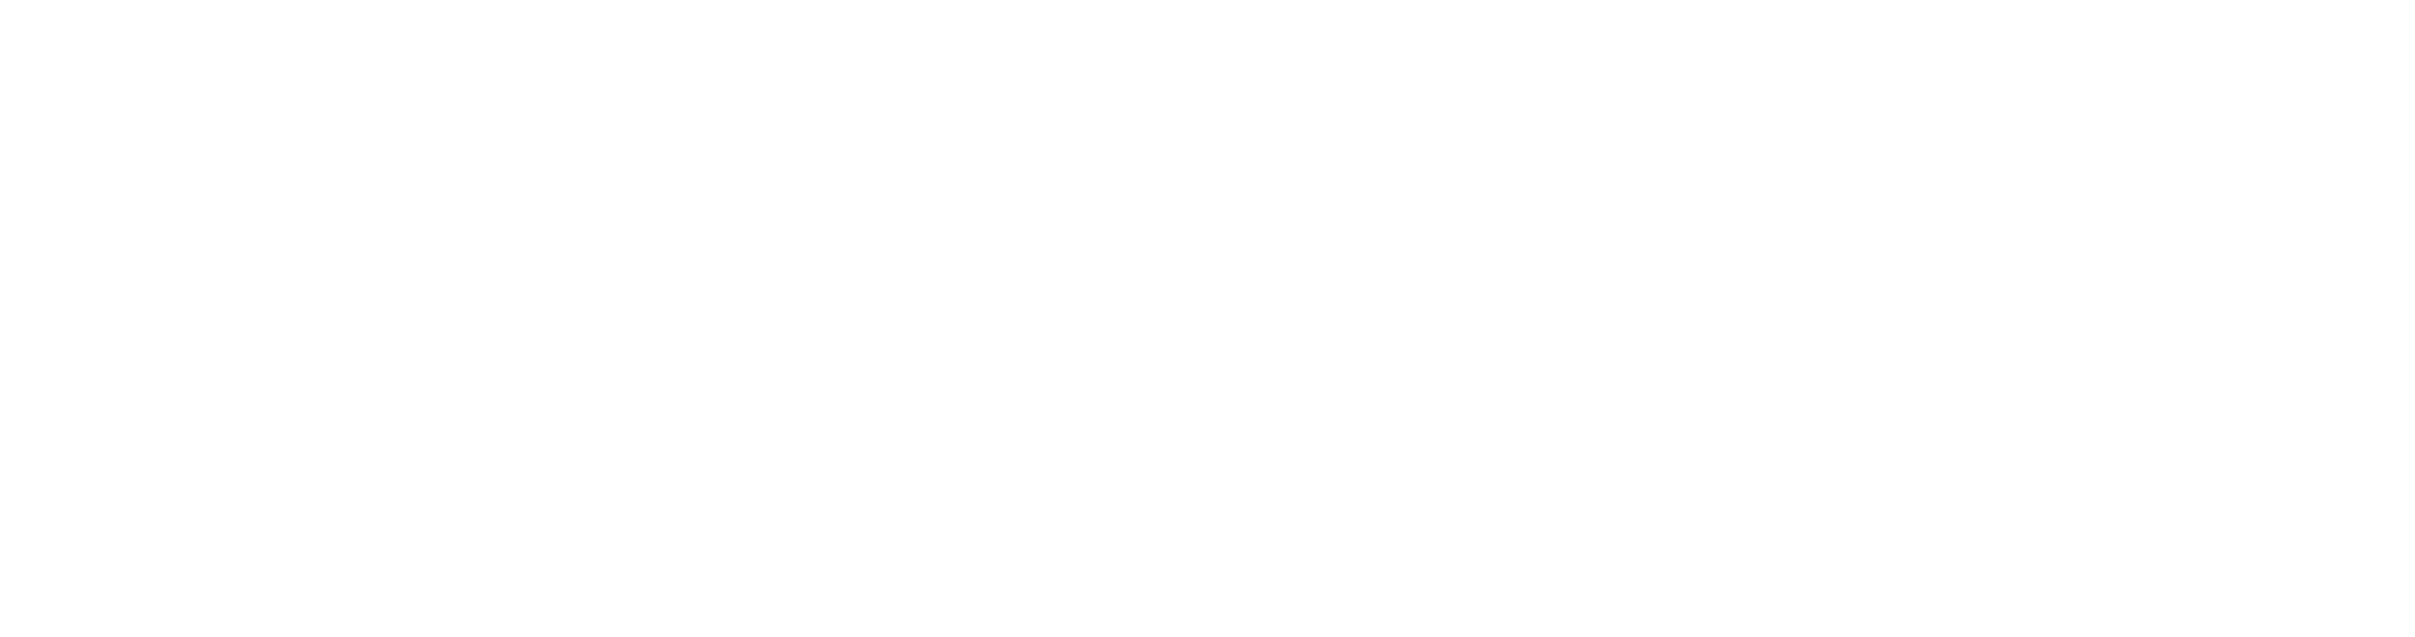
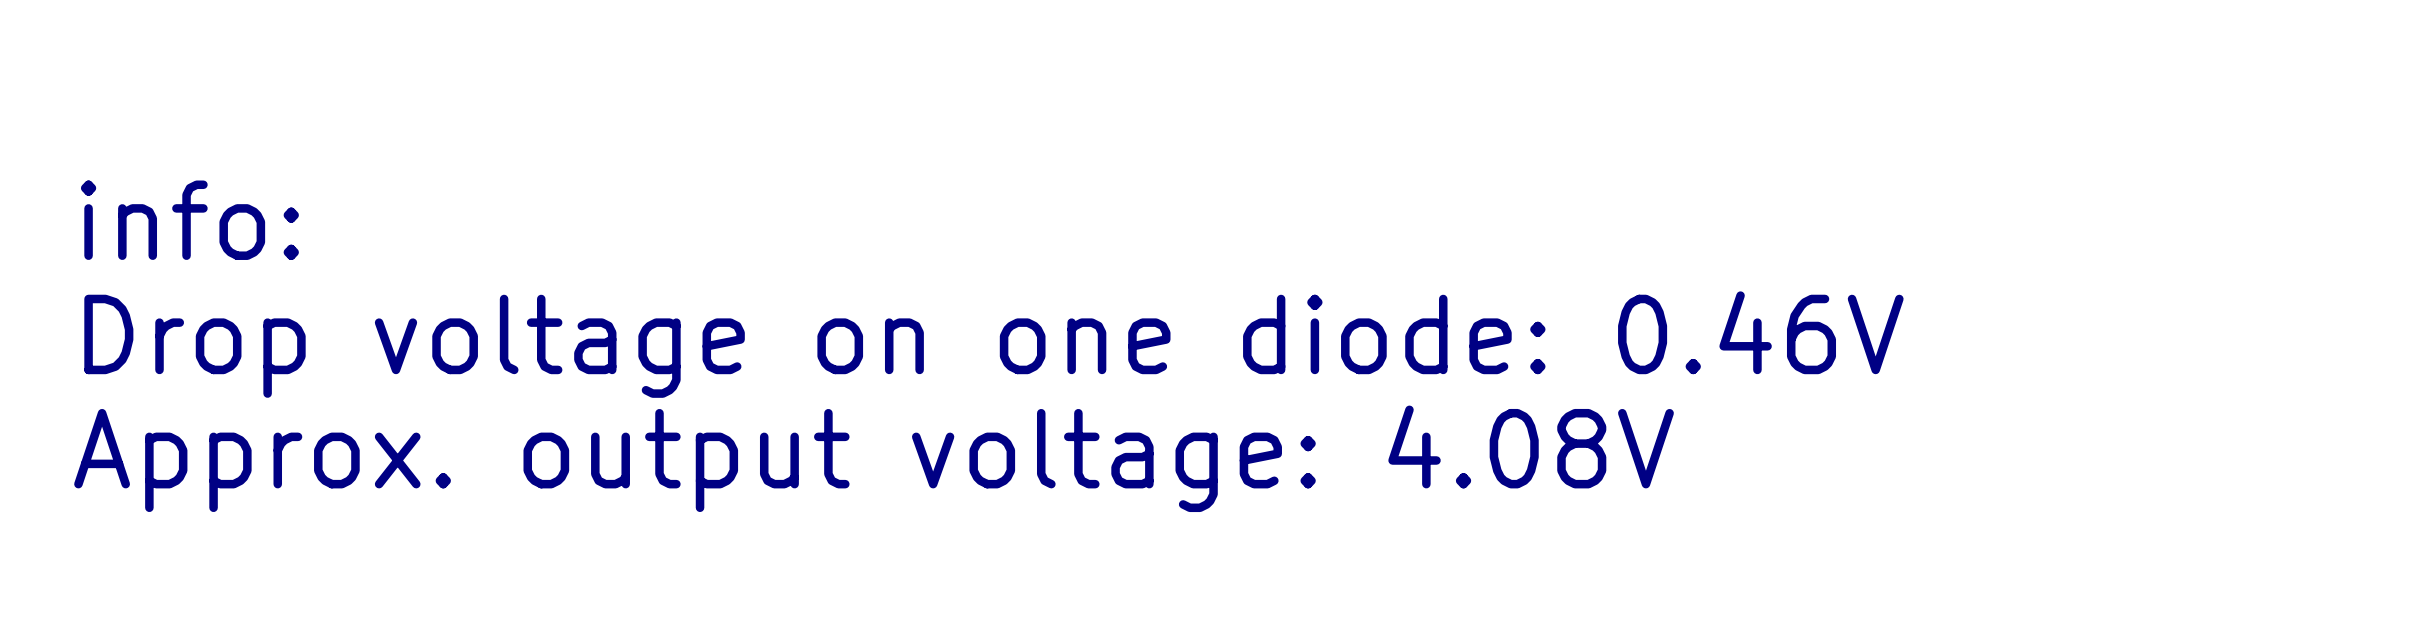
text: none -> info: (189, 220)
text: none -> Drop voltage on one diode: 0.46V (993, 344)
text: none -> Approx. output voltage: 4.08V (874, 458)

